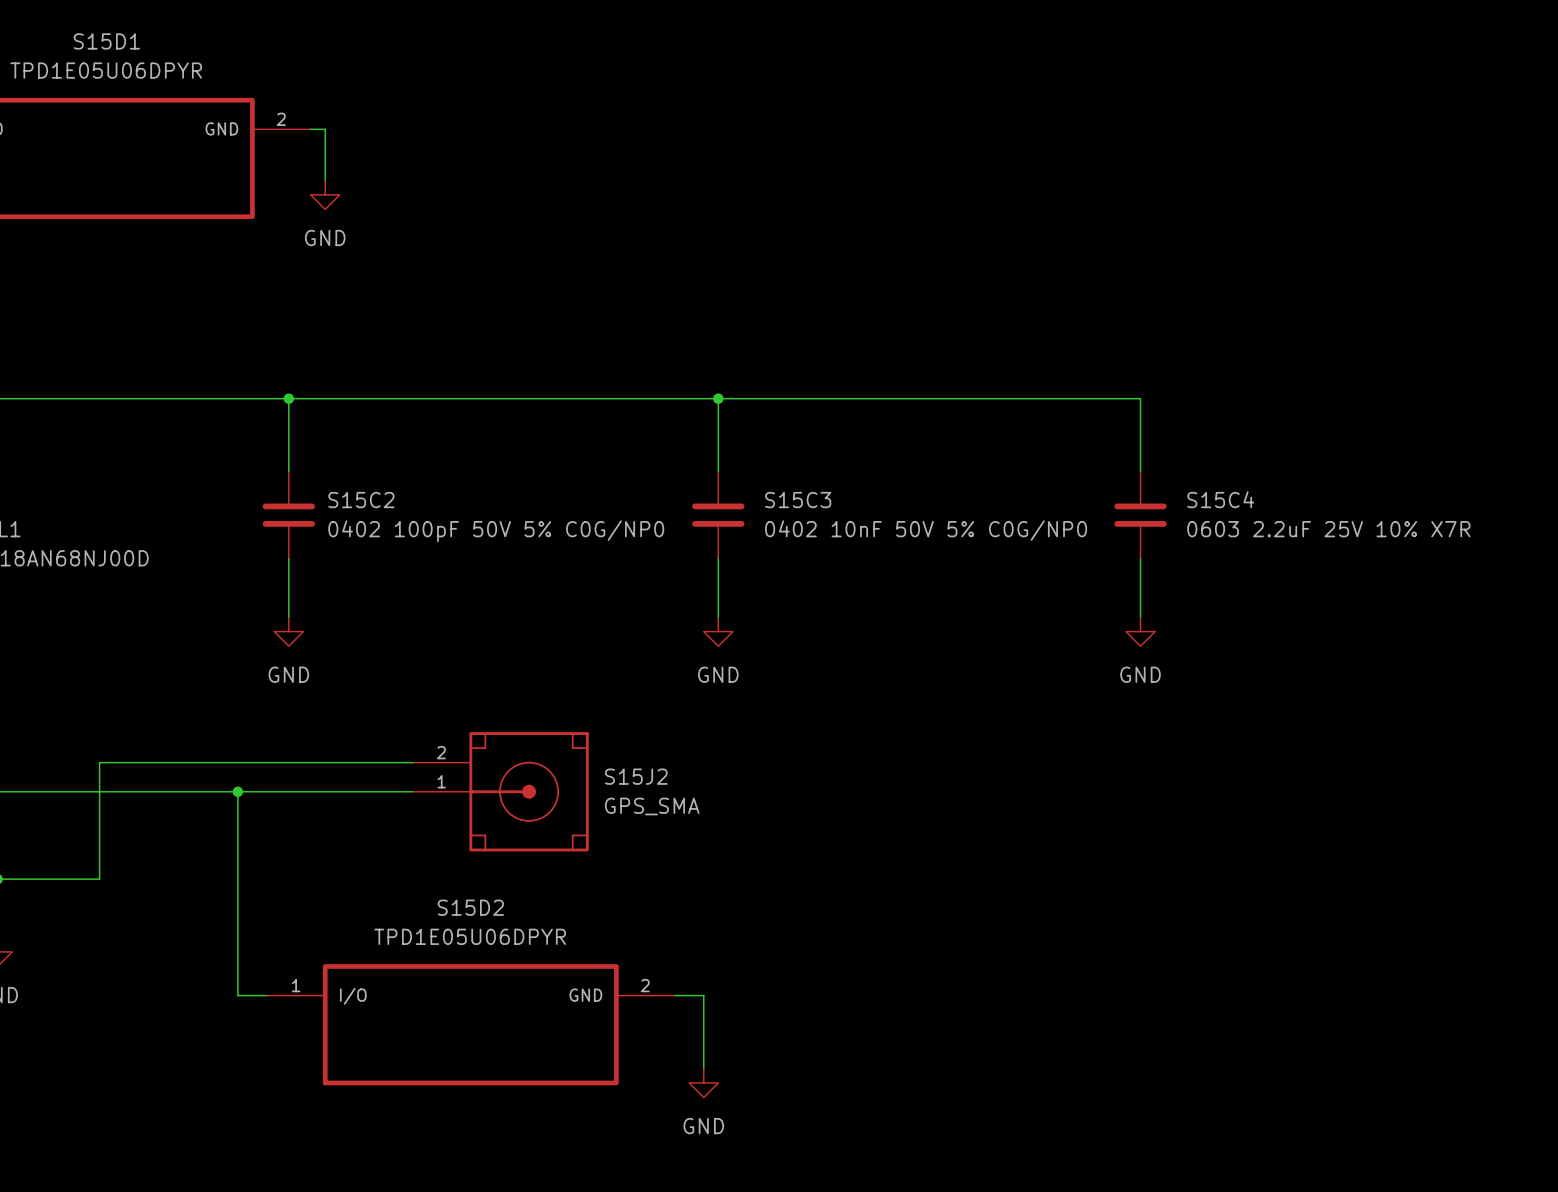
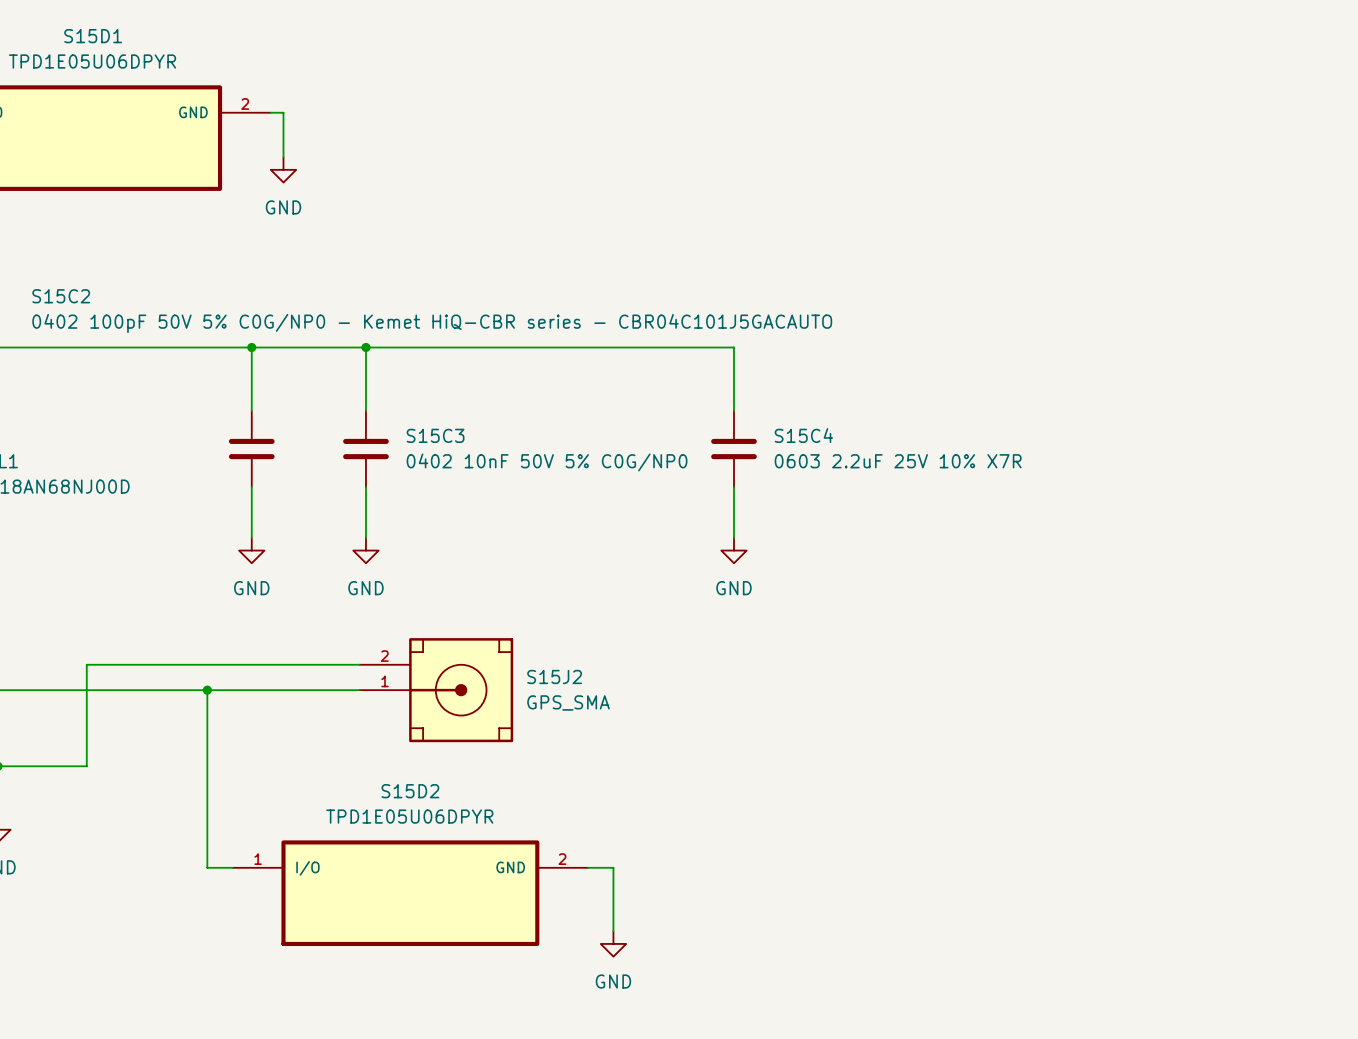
wire: none -> (365, 347) (365, 410)
junction: none -> (365, 347)
wire: (718, 398) (718, 471) -> none
junction: (718, 398) -> none
wire: (842, 398) (1140, 398) (1140, 471) -> (733, 347) (733, 410)
S15C2 name position: S15C2 (361, 500) -> S15C2 (61, 296)
S15C3 position: (718, 515) -> (365, 449)
S15C4 position: (1140, 515) -> (733, 449)
S15C2 value: 0402 100pF 50V 5% C0G/NP0 (496, 531) -> 0402 100pF 50V 5% C0G/NP0 - Kemet HiQ-CBR series - CBR04C101J5GACAUTO (432, 323)
wire: none -> (365, 487) (365, 537)
wire: (718, 558) (718, 617) -> (733, 487) (733, 537)
wire: (1140, 558) (1140, 617) -> none
power symbol: none -> GND (365, 550)
power symbol position: GND (718, 631) -> GND (733, 550)
power symbol: GND (1140, 631) -> none

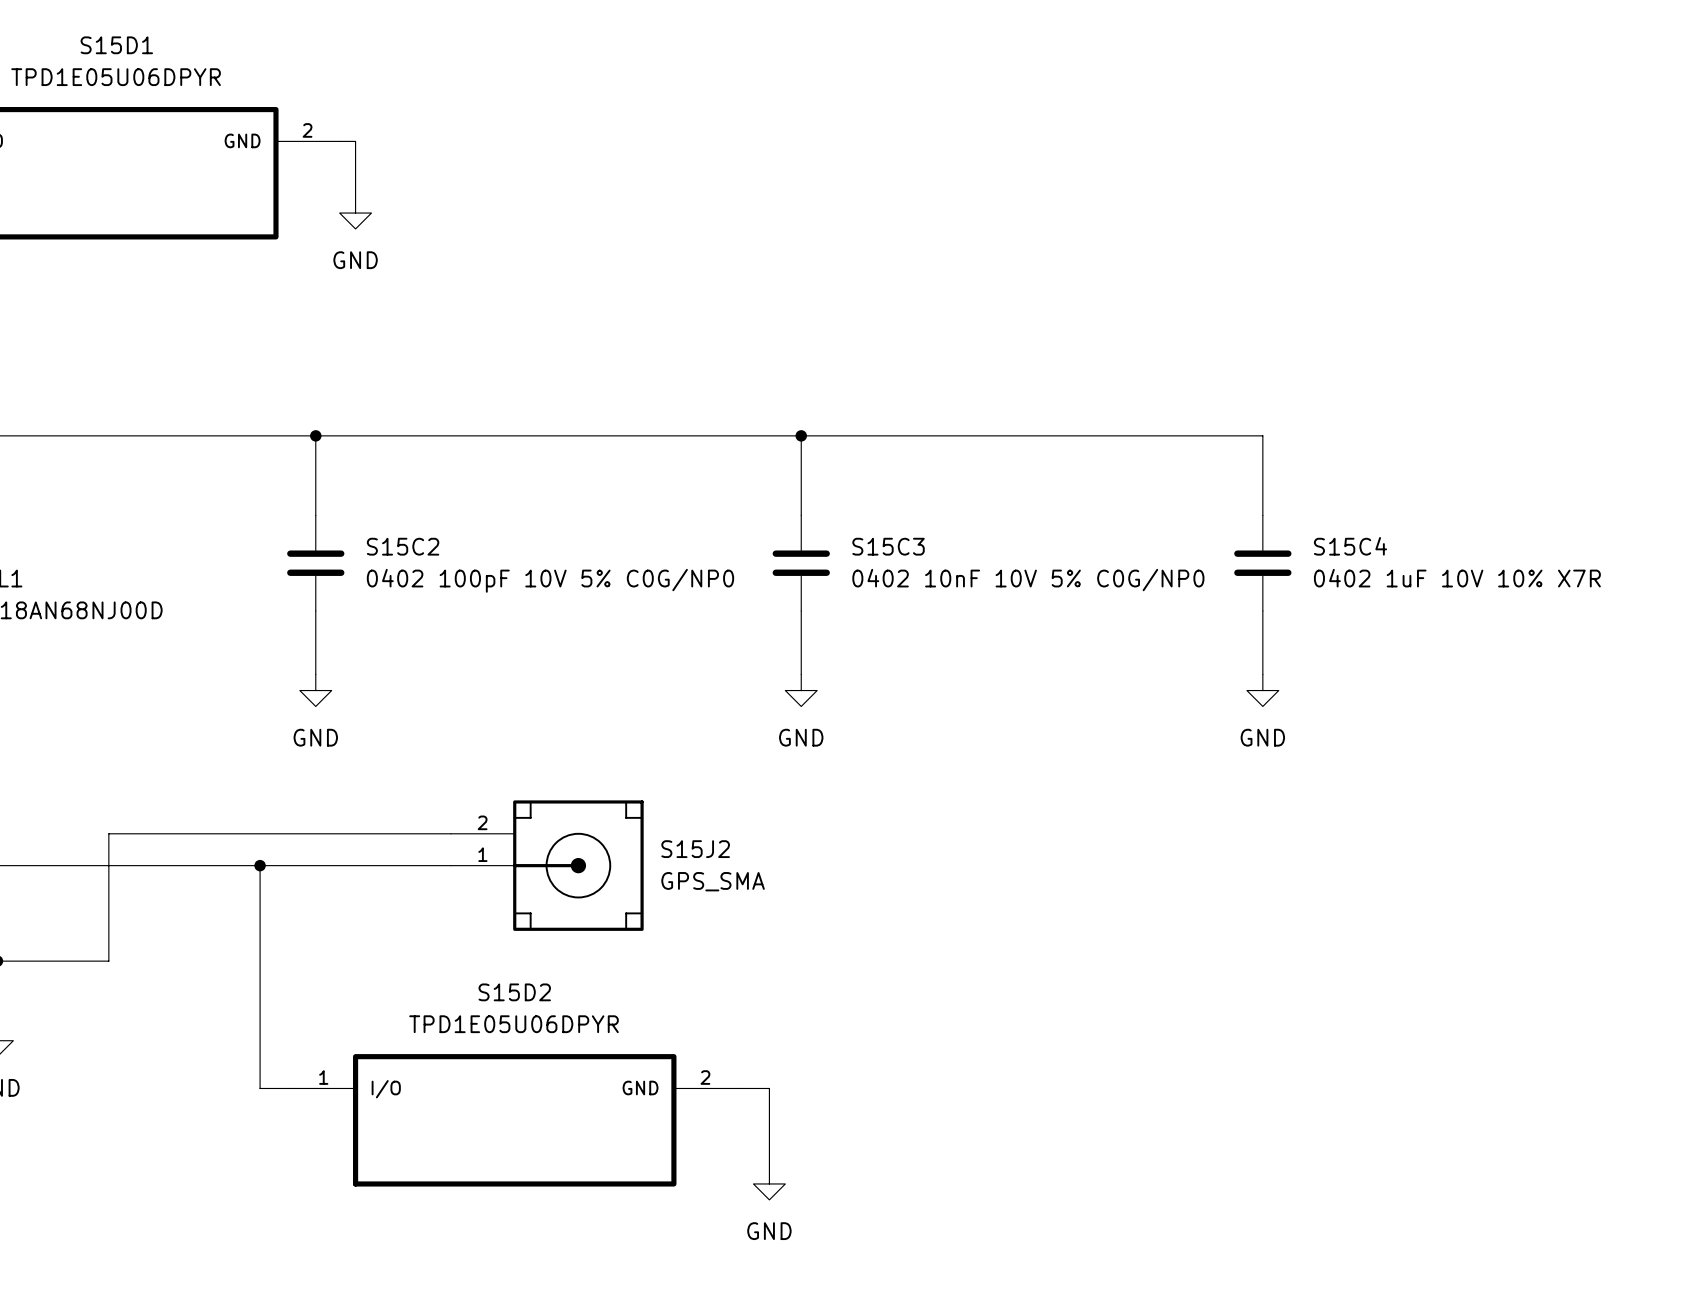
S15C2 name position: S15C2 (61, 296) -> S15C2 (403, 546)
S15C2 value: 0402 100pF 50V 5% C0G/NP0 - Kemet HiQ-CBR series - CBR04C101J5GACAUTO (432, 323) -> 0402 100pF 10V 5% C0G/NP0 (550, 580)
wire: (365, 347) (365, 410) -> none
junction: (365, 347) -> none
wire: none -> (801, 435) (801, 515)
junction: none -> (801, 435)
wire: (733, 347) (733, 410) -> (920, 435) (1262, 435) (1262, 515)
S15C3 position: (365, 449) -> (801, 563)
S15C4 position: (733, 449) -> (1262, 563)
S15C4 value: 0603 2.2uF 25V 10% X7R (898, 461) -> 0402 1uF 10V 10% X7R (1457, 578)
S15C3 value: 0402 10nF 50V 5% C0G/NP0 (547, 462) -> 0402 10nF 10V 5% C0G/NP0 (1028, 580)
wire: (365, 487) (365, 537) -> none
wire: (733, 487) (733, 537) -> (801, 610) (801, 674)
wire: none -> (1262, 610) (1262, 674)
power symbol: GND (365, 550) -> none
power symbol position: GND (733, 550) -> GND (801, 690)
power symbol: none -> GND (1262, 690)

